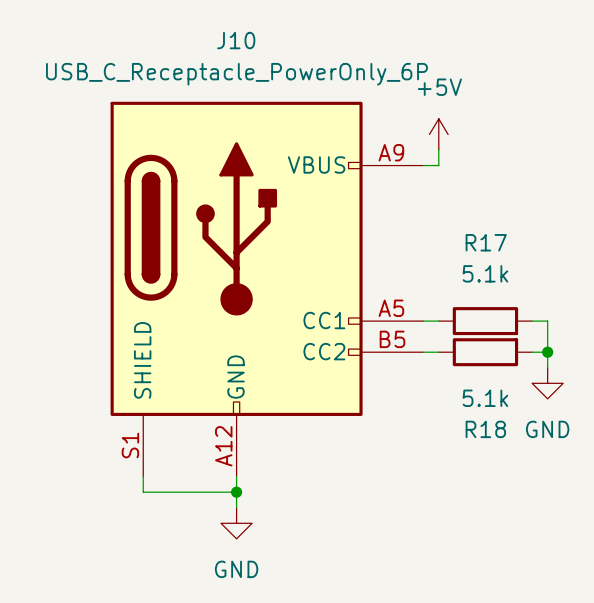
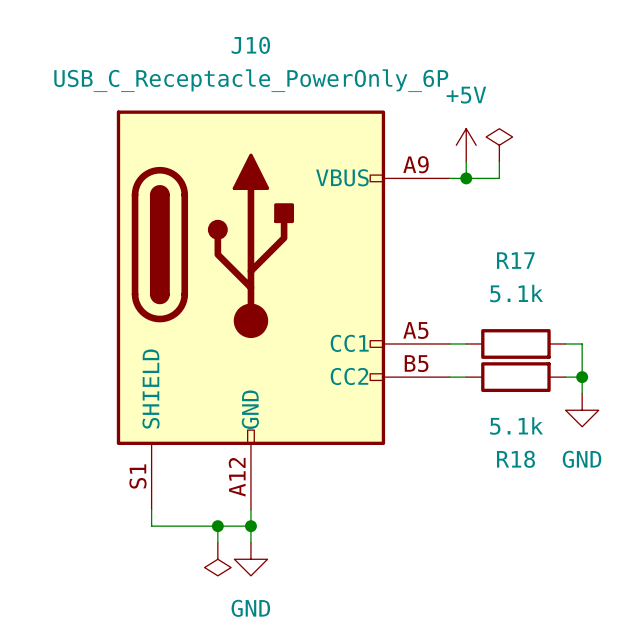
power symbol: none -> (499, 145)
wire: none -> (499, 161) (499, 178) (466, 178)
junction: none -> (466, 178)
wire: none -> (217, 526) (217, 542)
junction: none -> (217, 526)
power symbol: none -> (217, 559)

